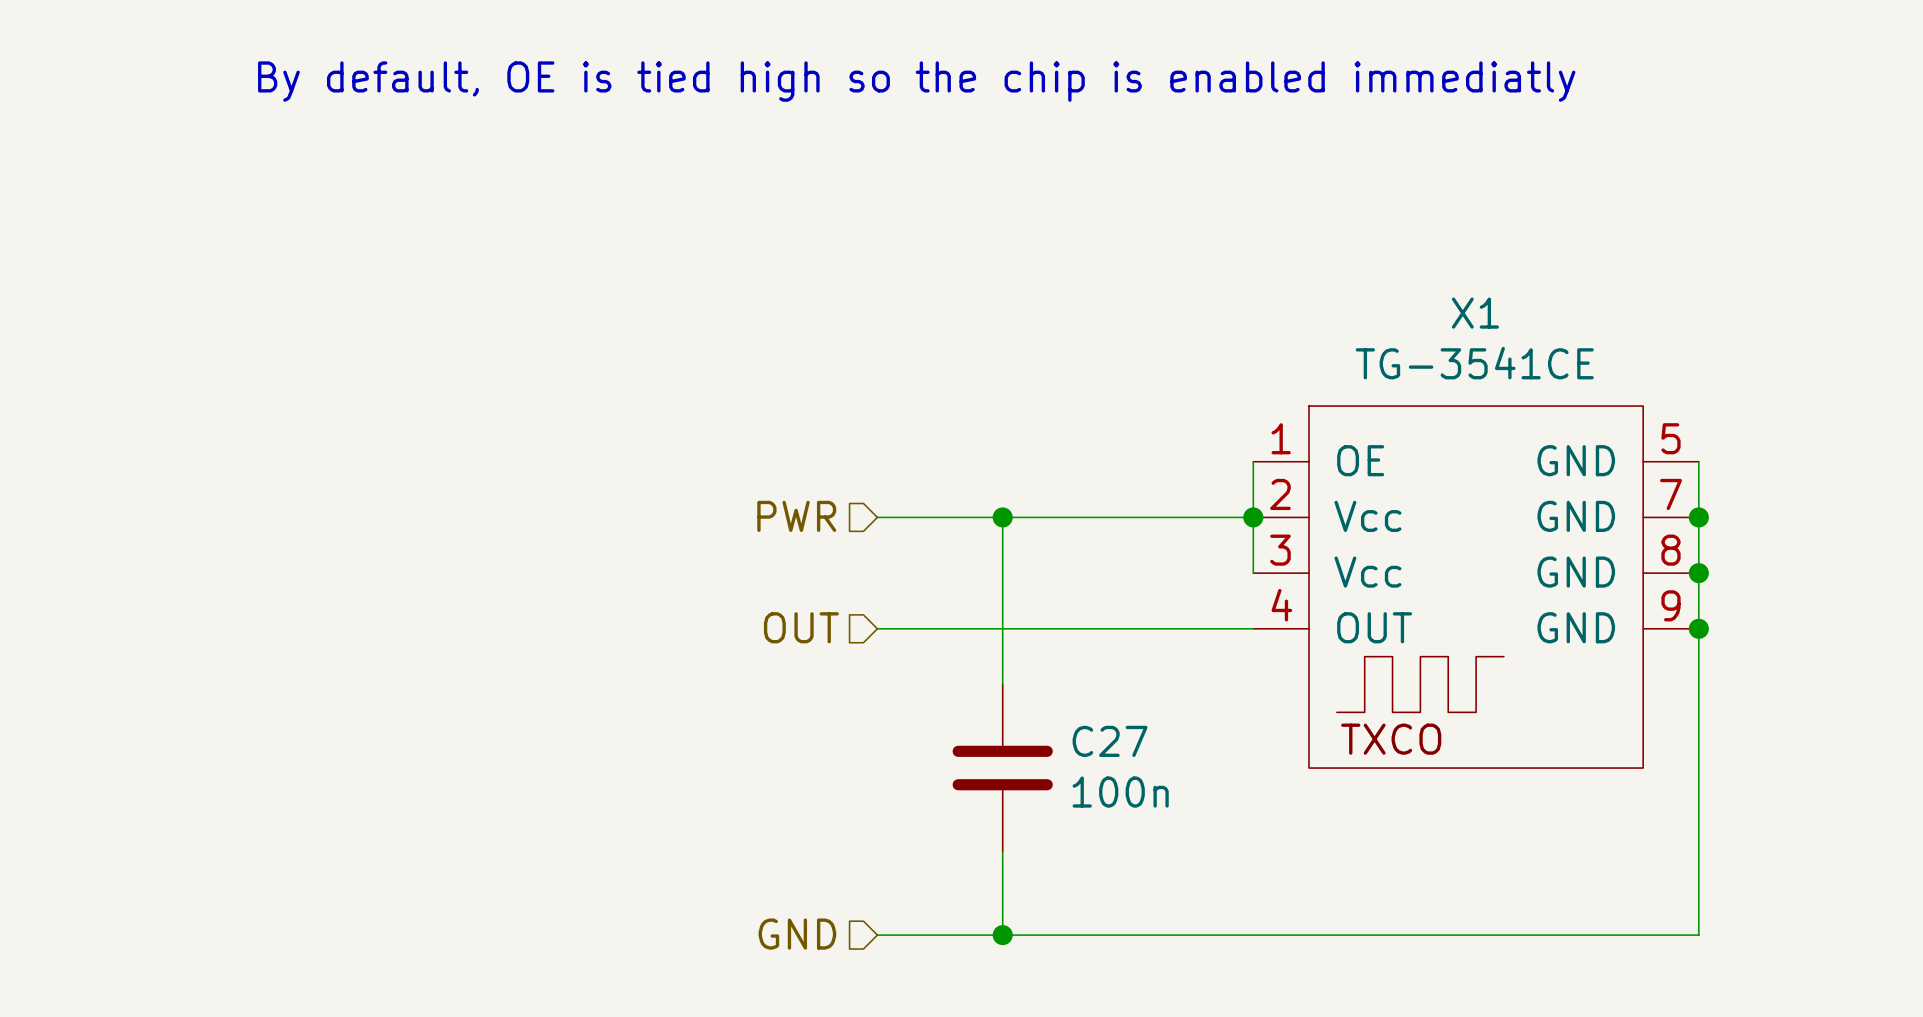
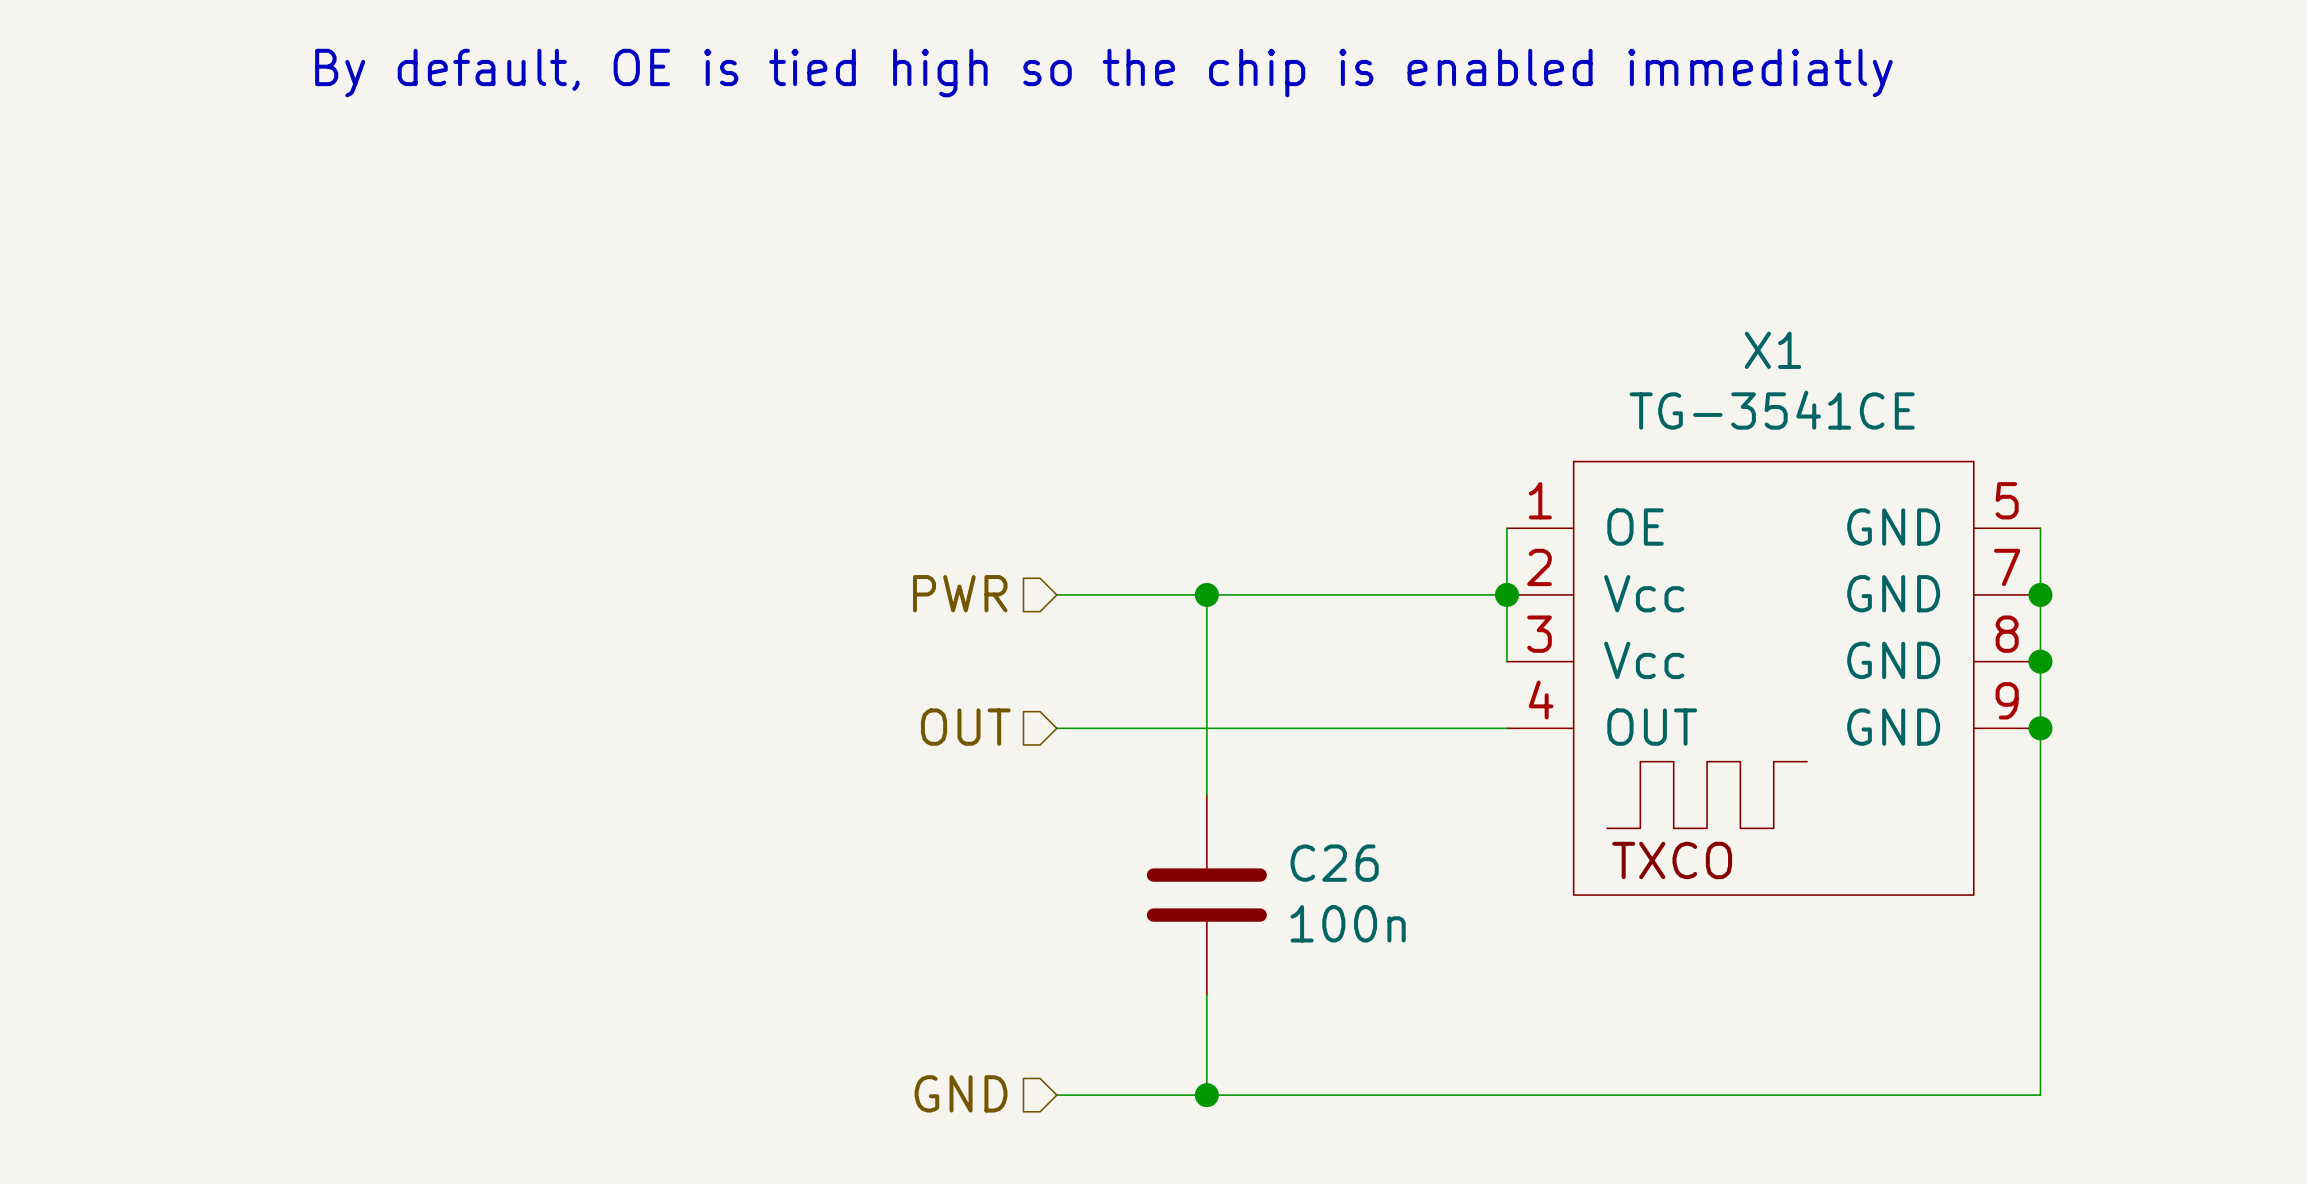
C27 name: C27 (1110, 741) -> C26 (1334, 863)

